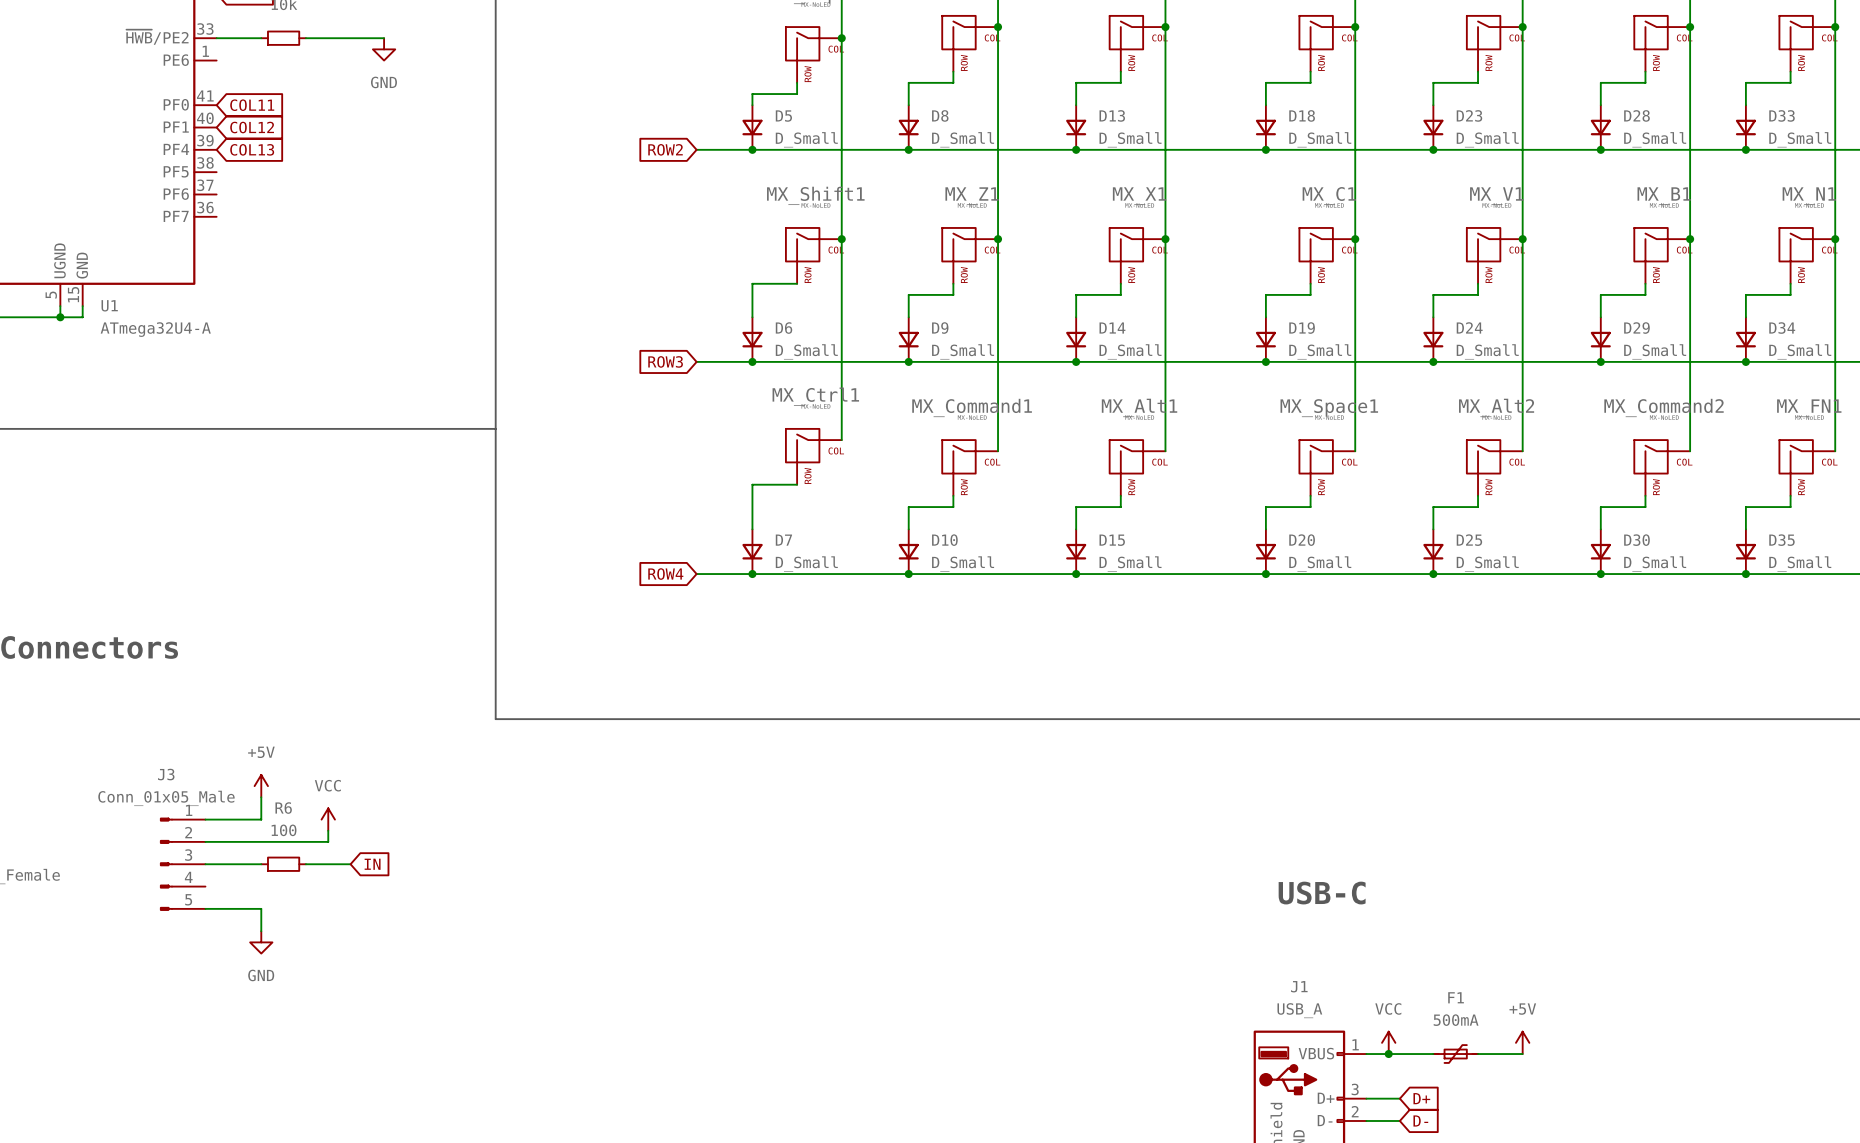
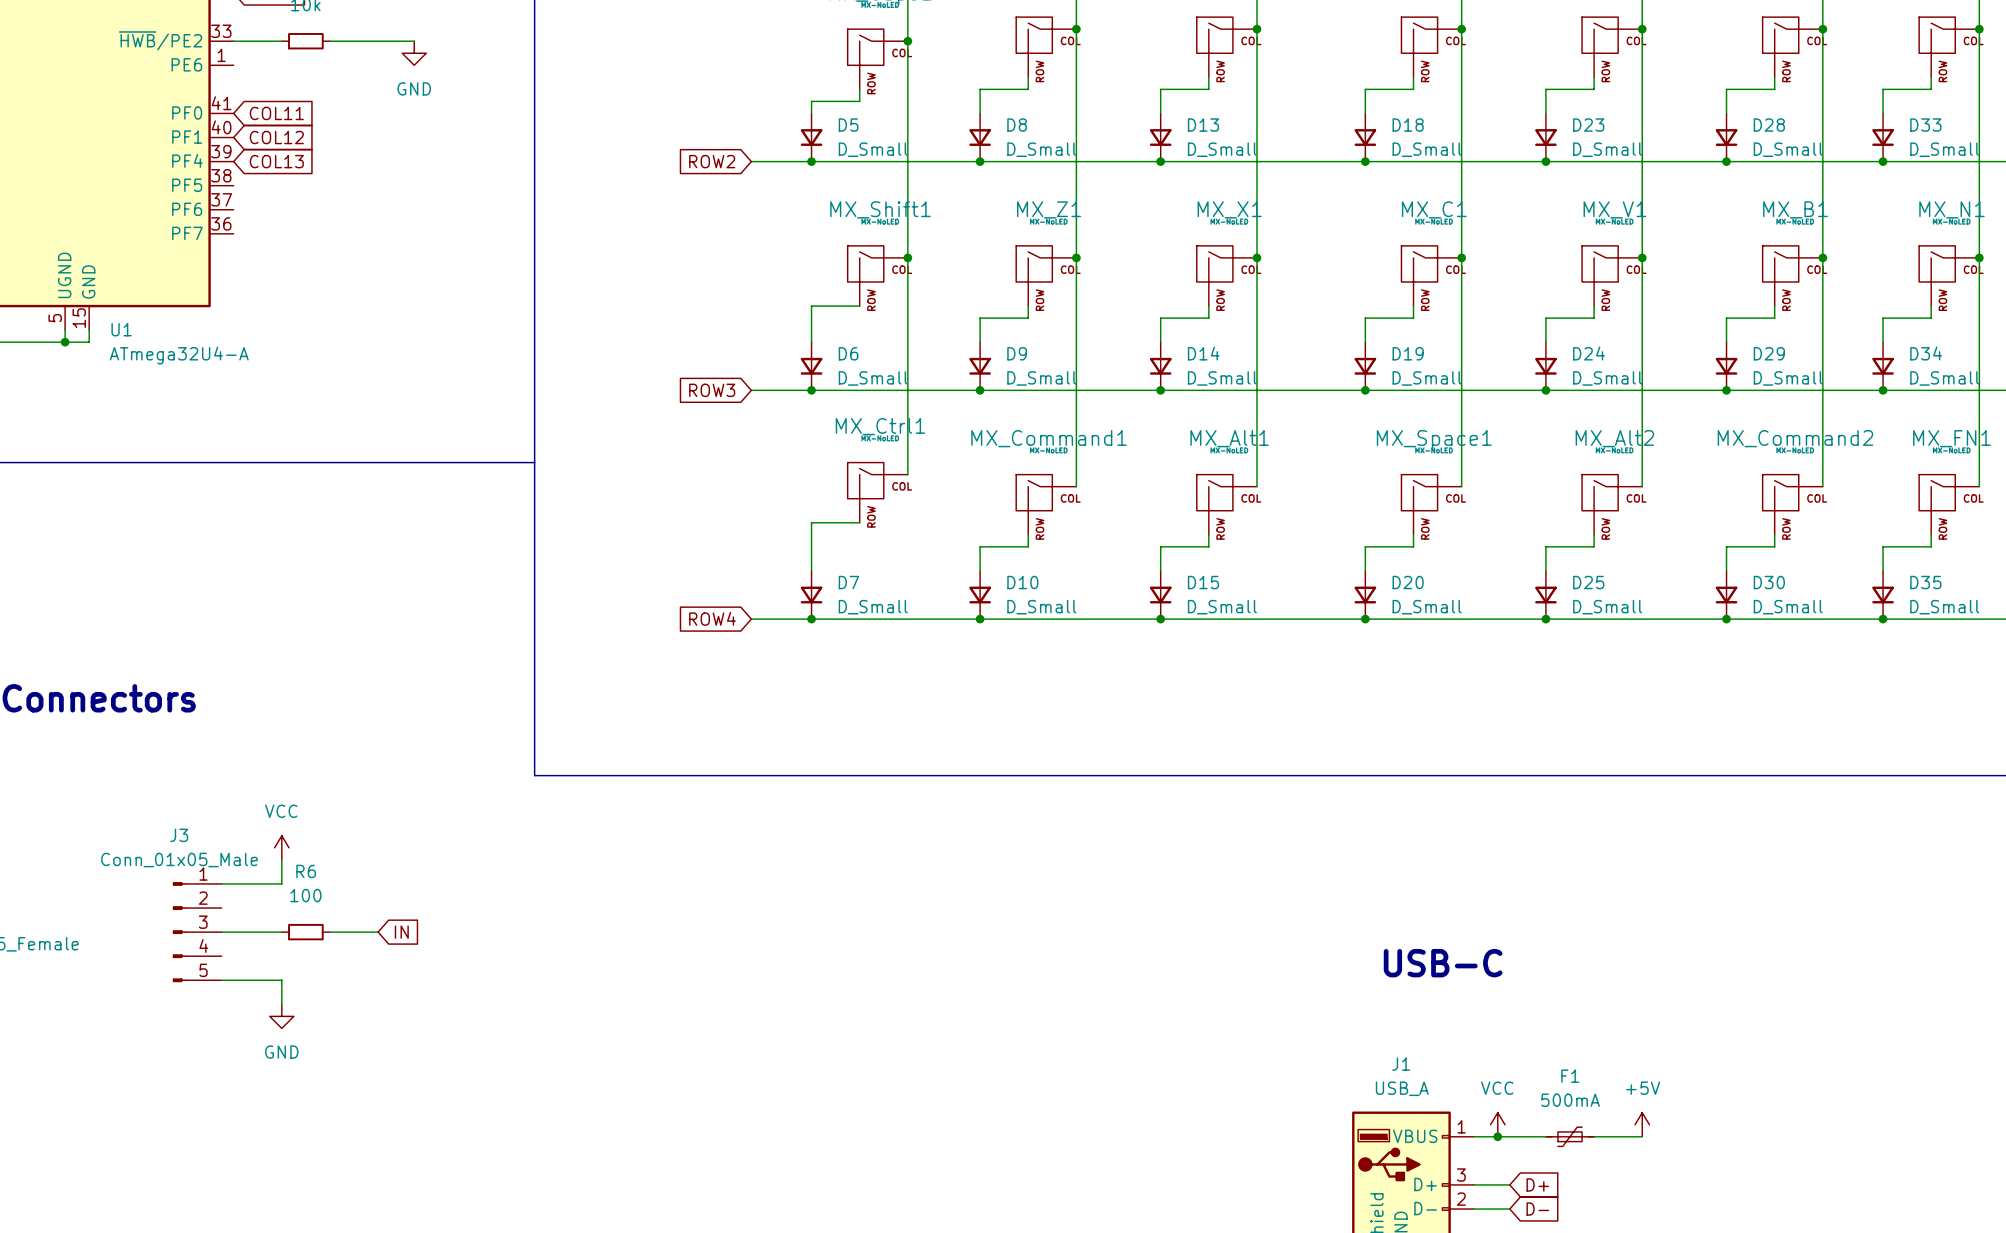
power symbol: +5V (261, 786) -> VCC (281, 847)
power symbol: VCC (328, 819) -> none
wire: (328, 830) (328, 841) (205, 841) -> none

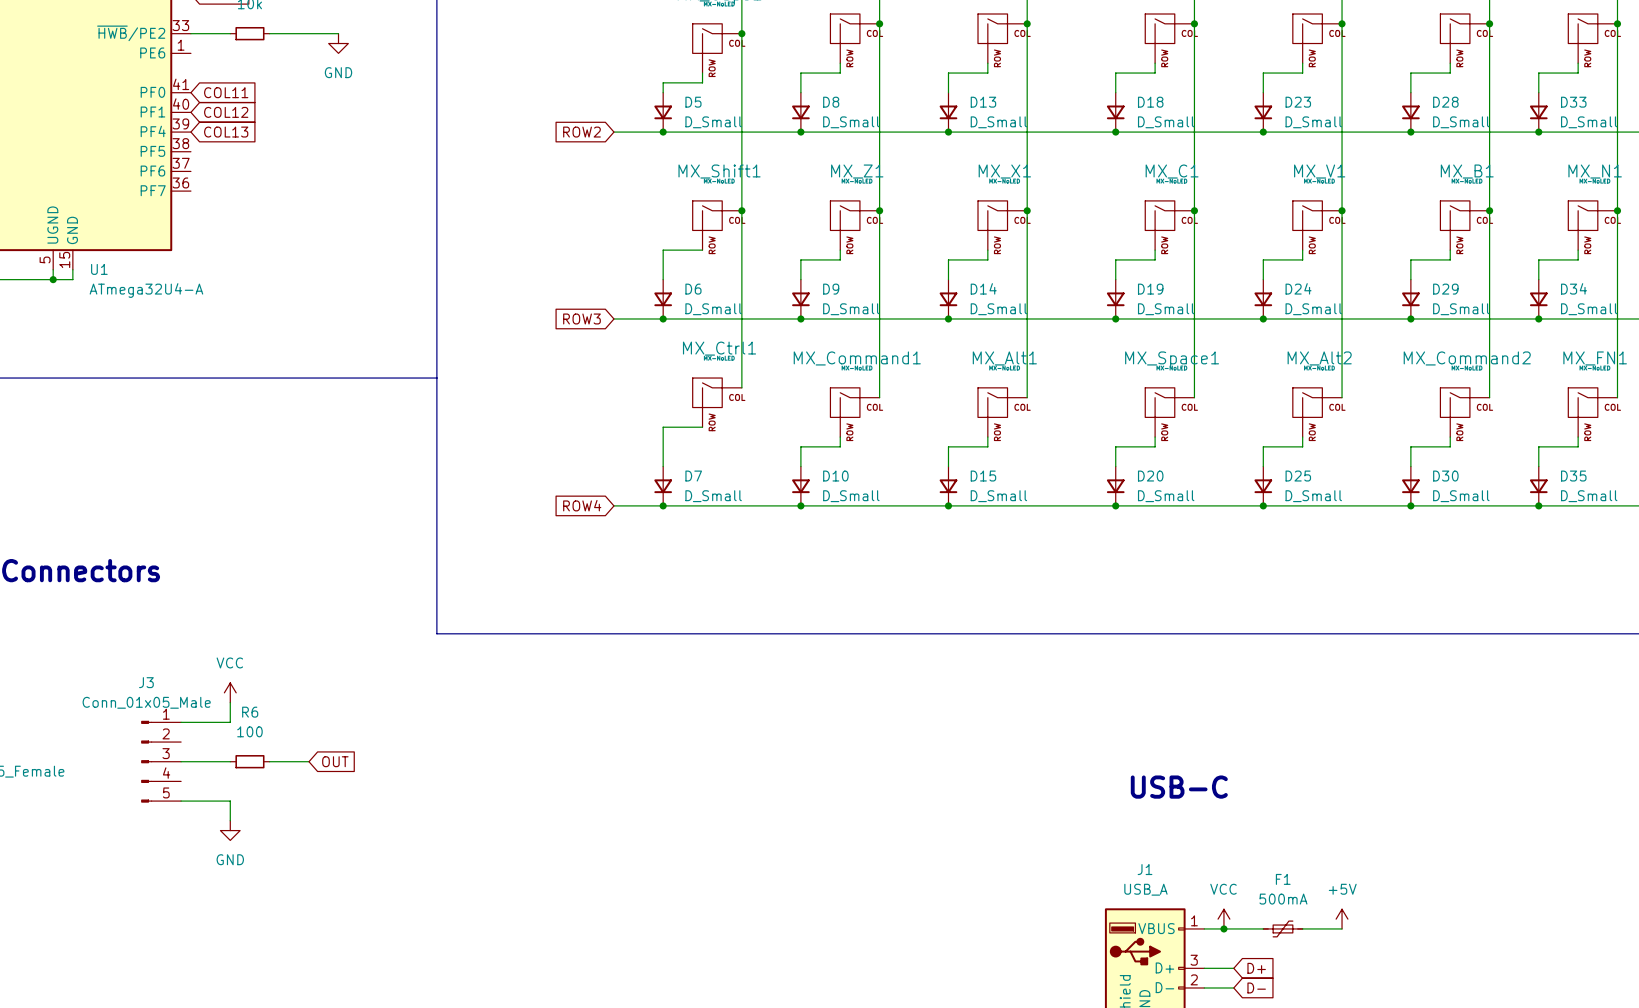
global label: IN (401, 932) -> OUT (335, 761)

